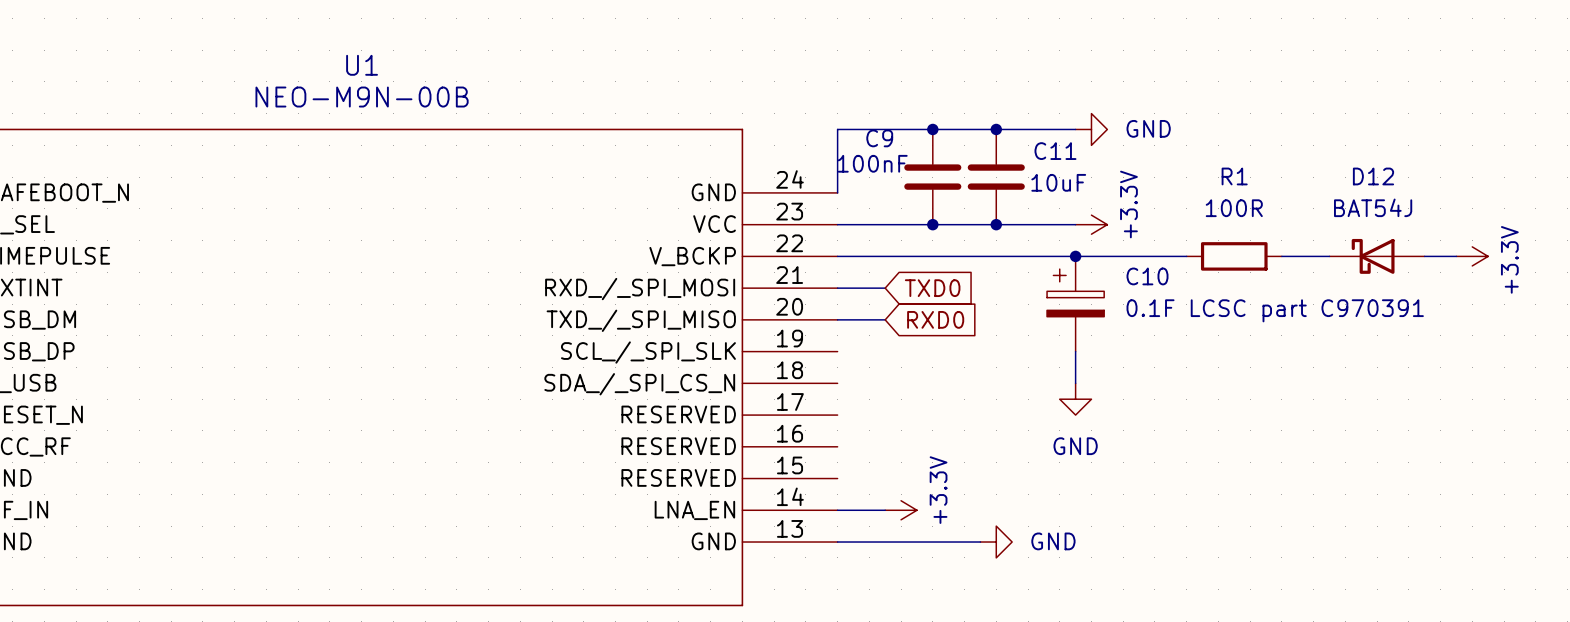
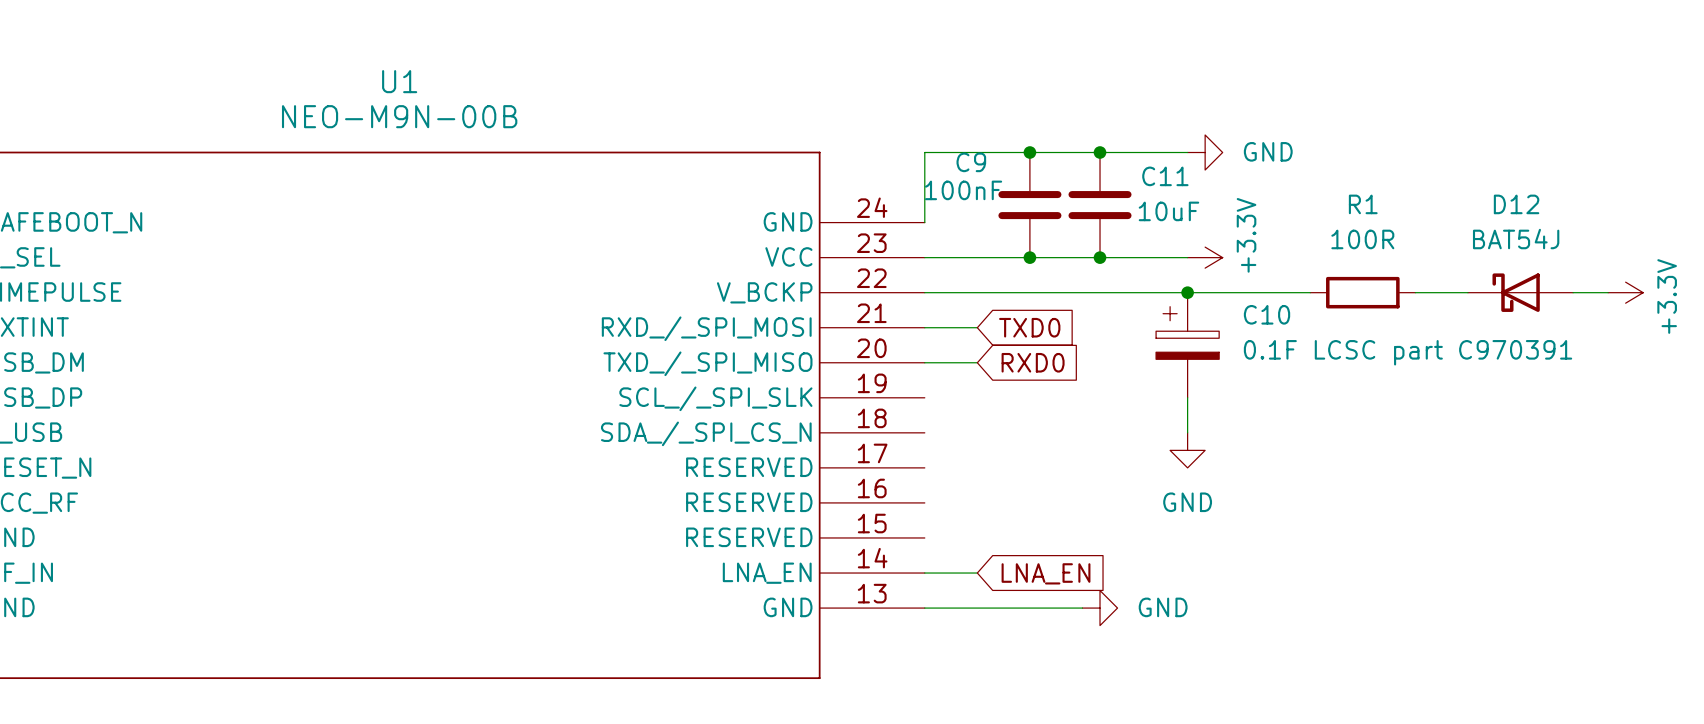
power symbol: +3.3V (901, 510) -> none
global label: none -> LNA_EN (1046, 573)

